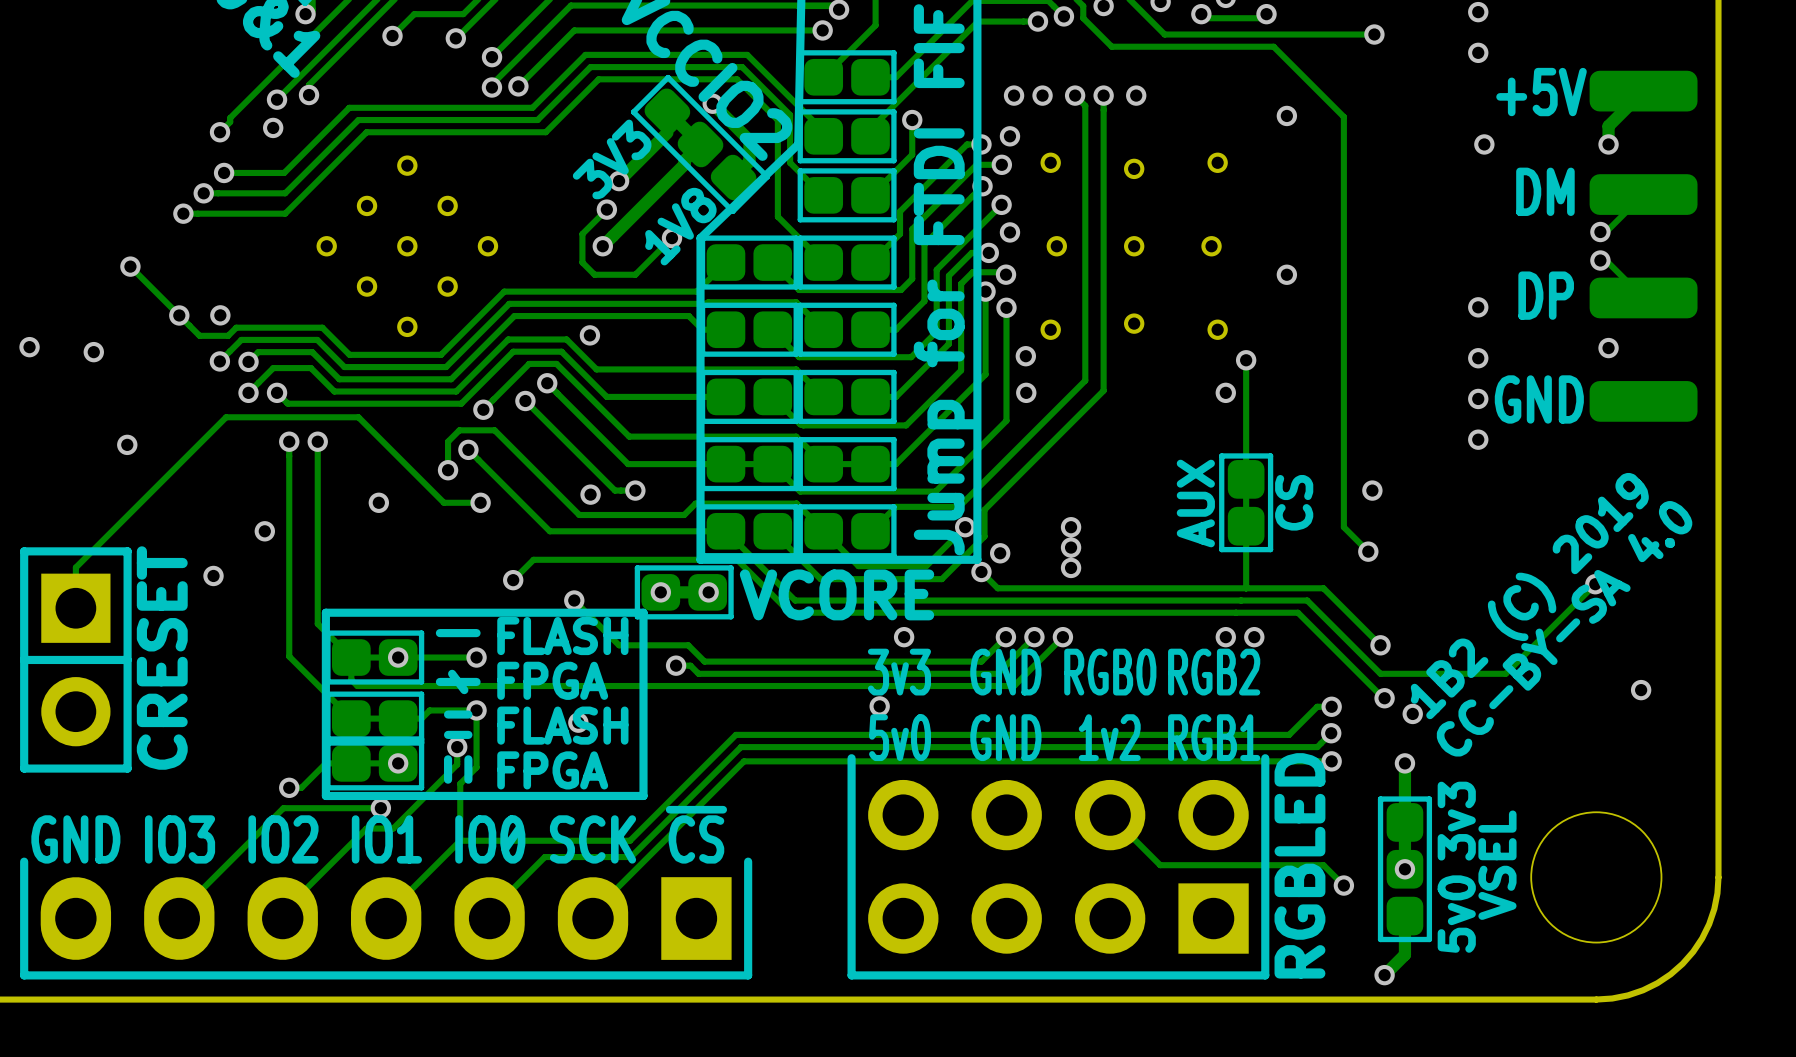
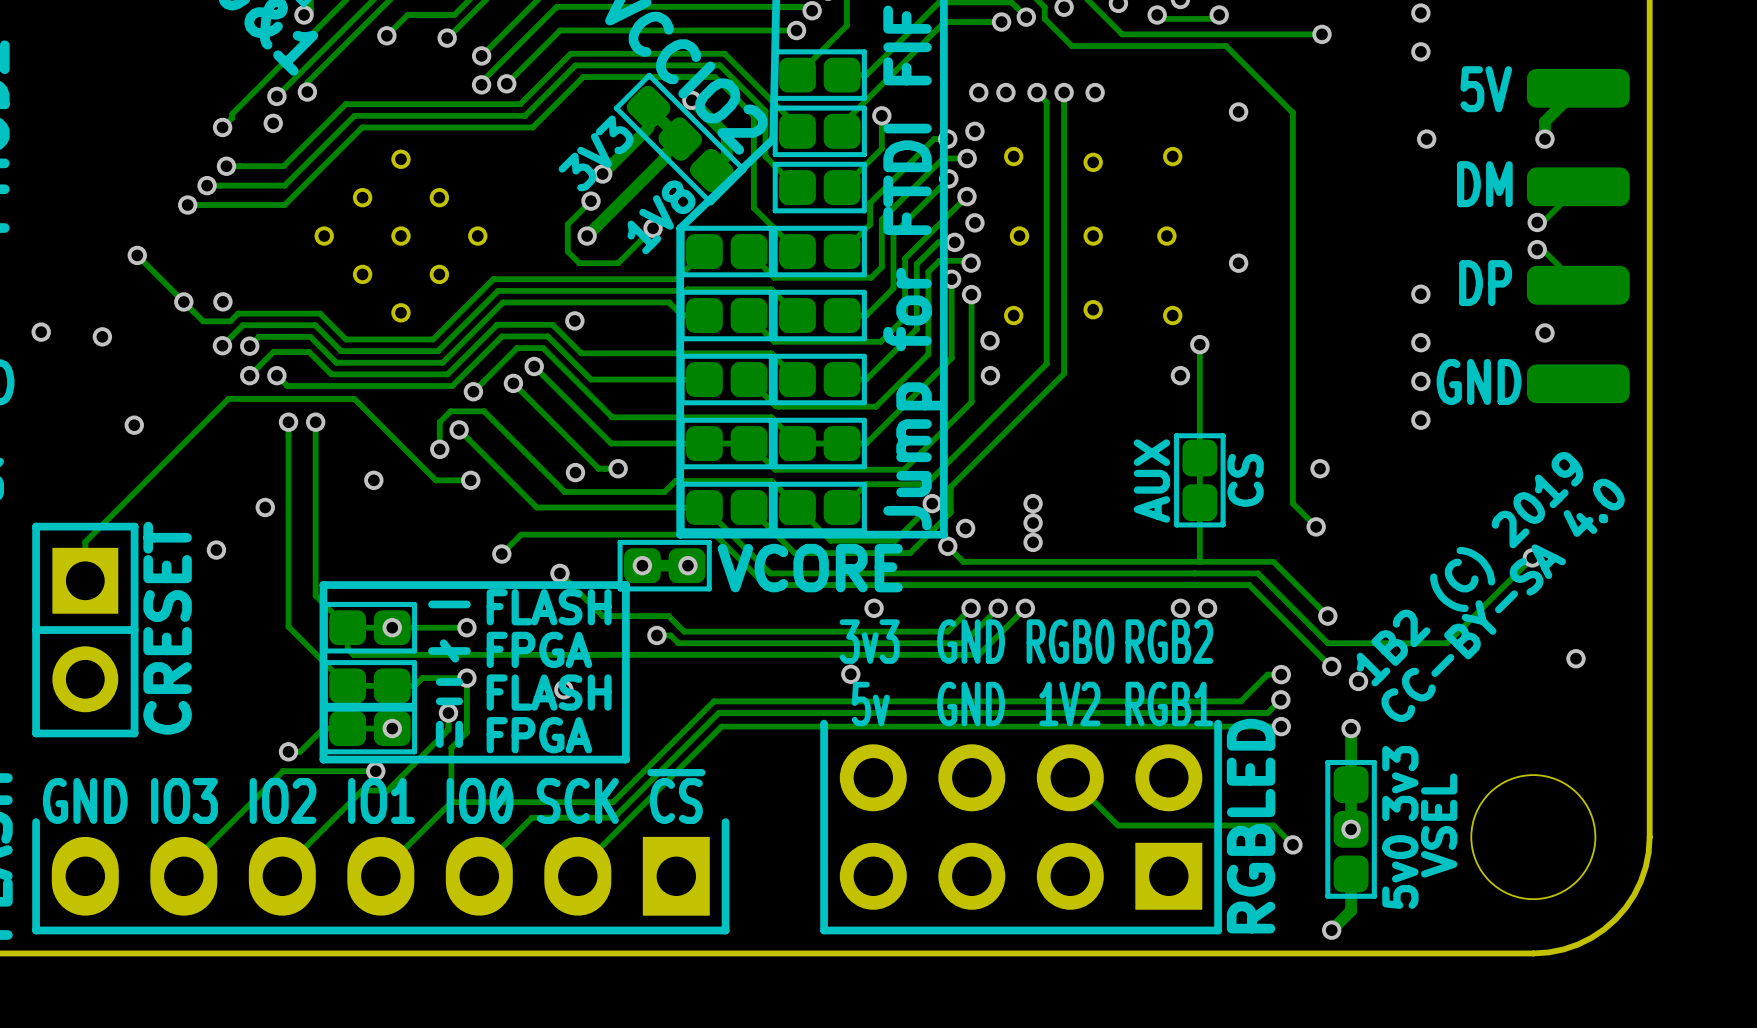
text: +5V (1541, 92) -> 5V (1486, 89)
text: 5v0 (900, 737) -> 5v (870, 704)
text: 1v2 (1109, 737) -> 1V2 (1069, 704)

